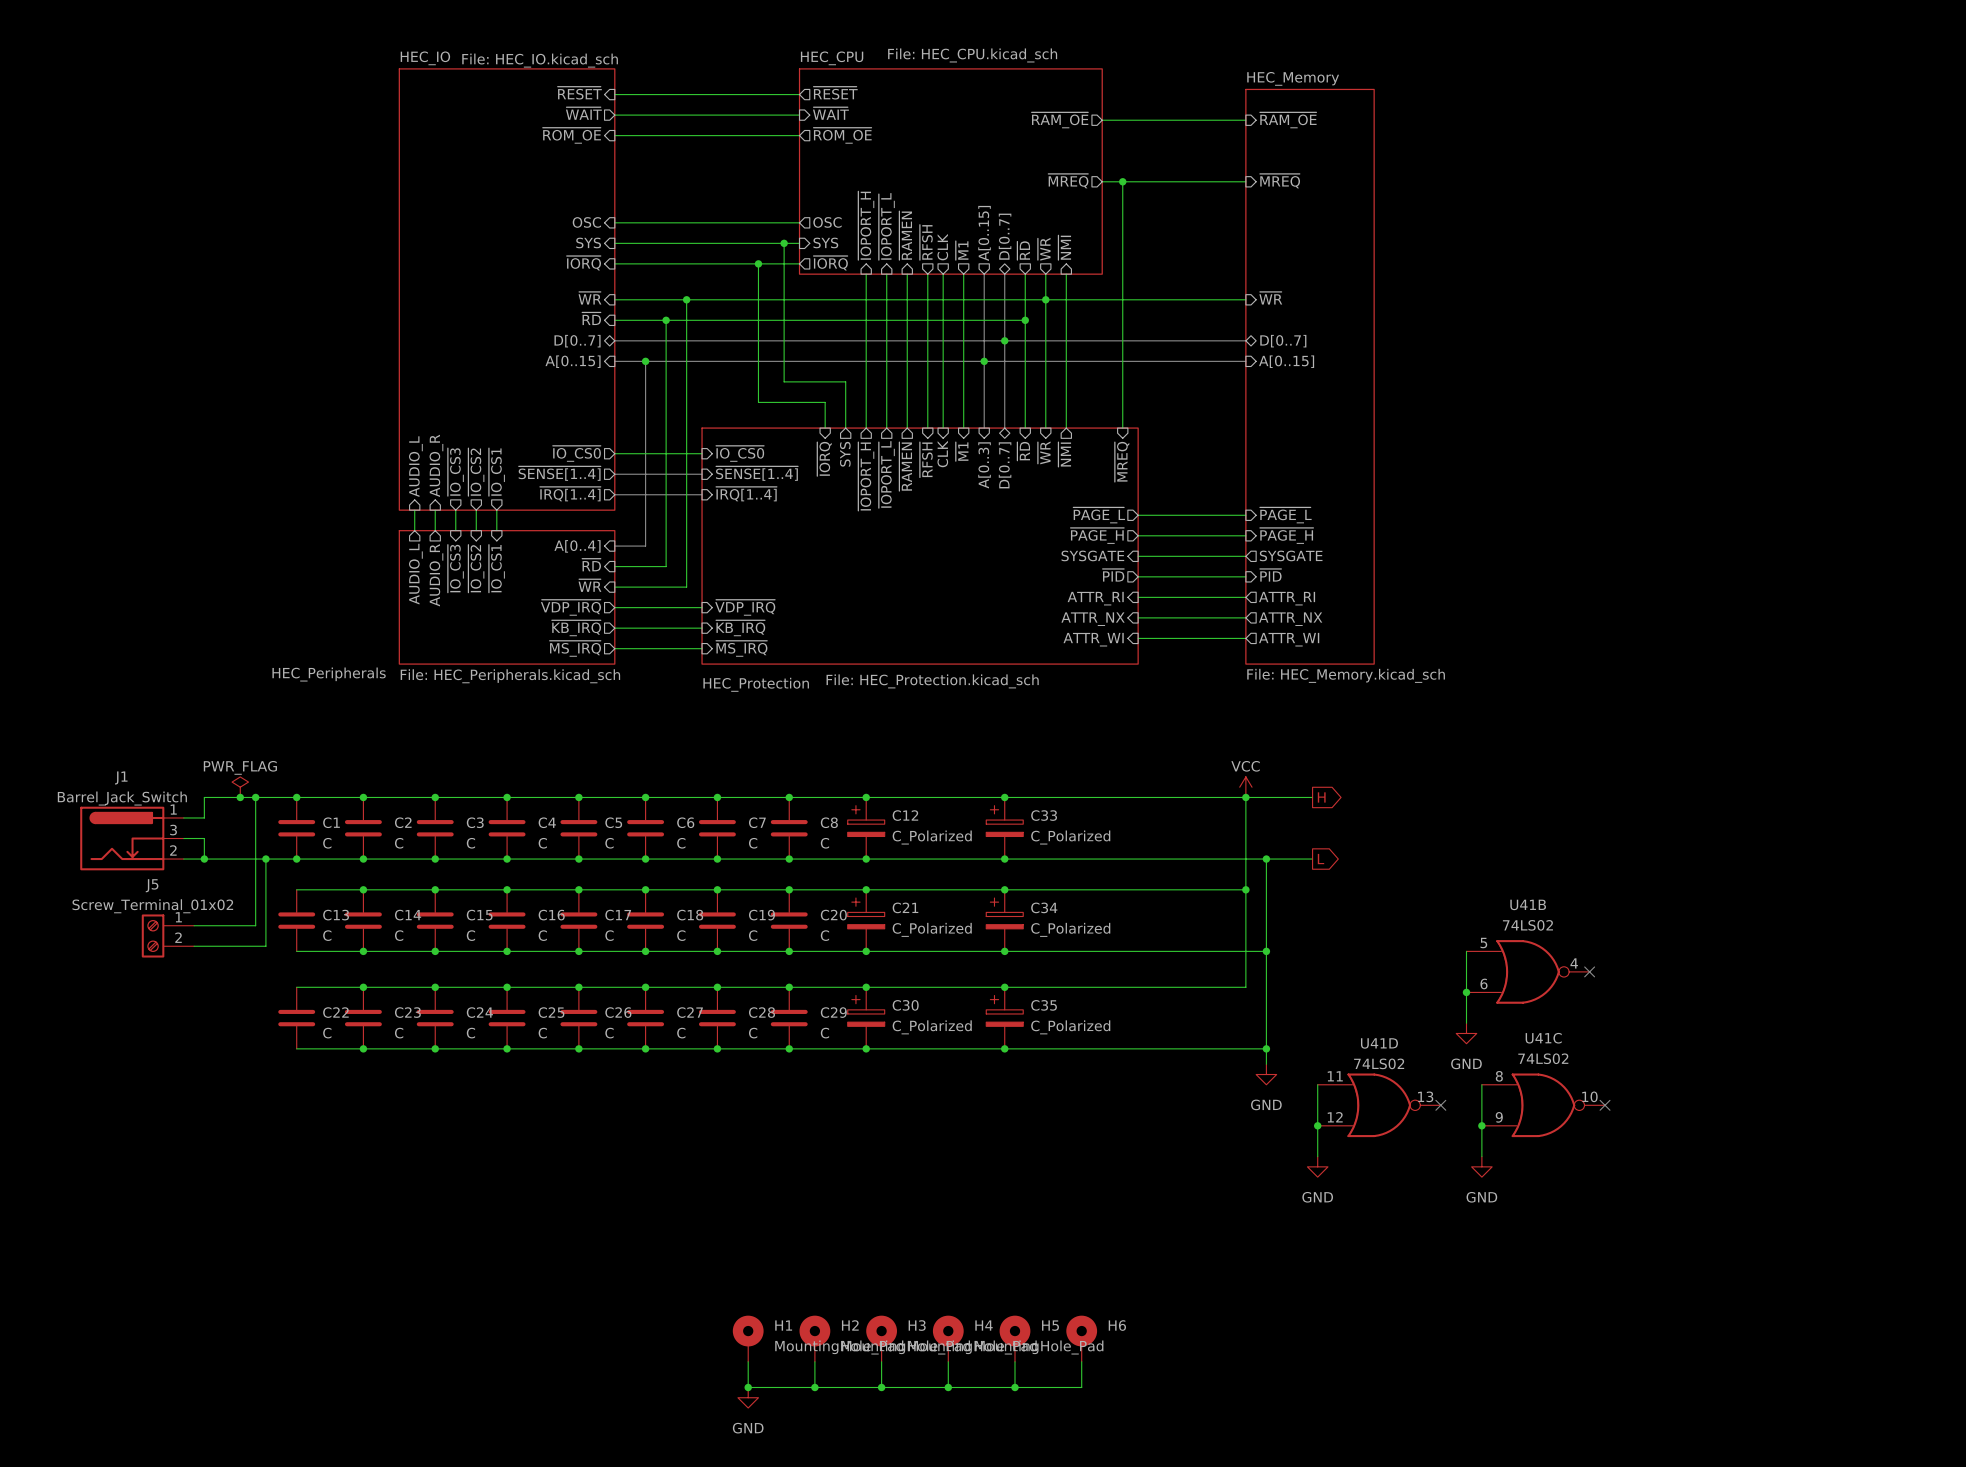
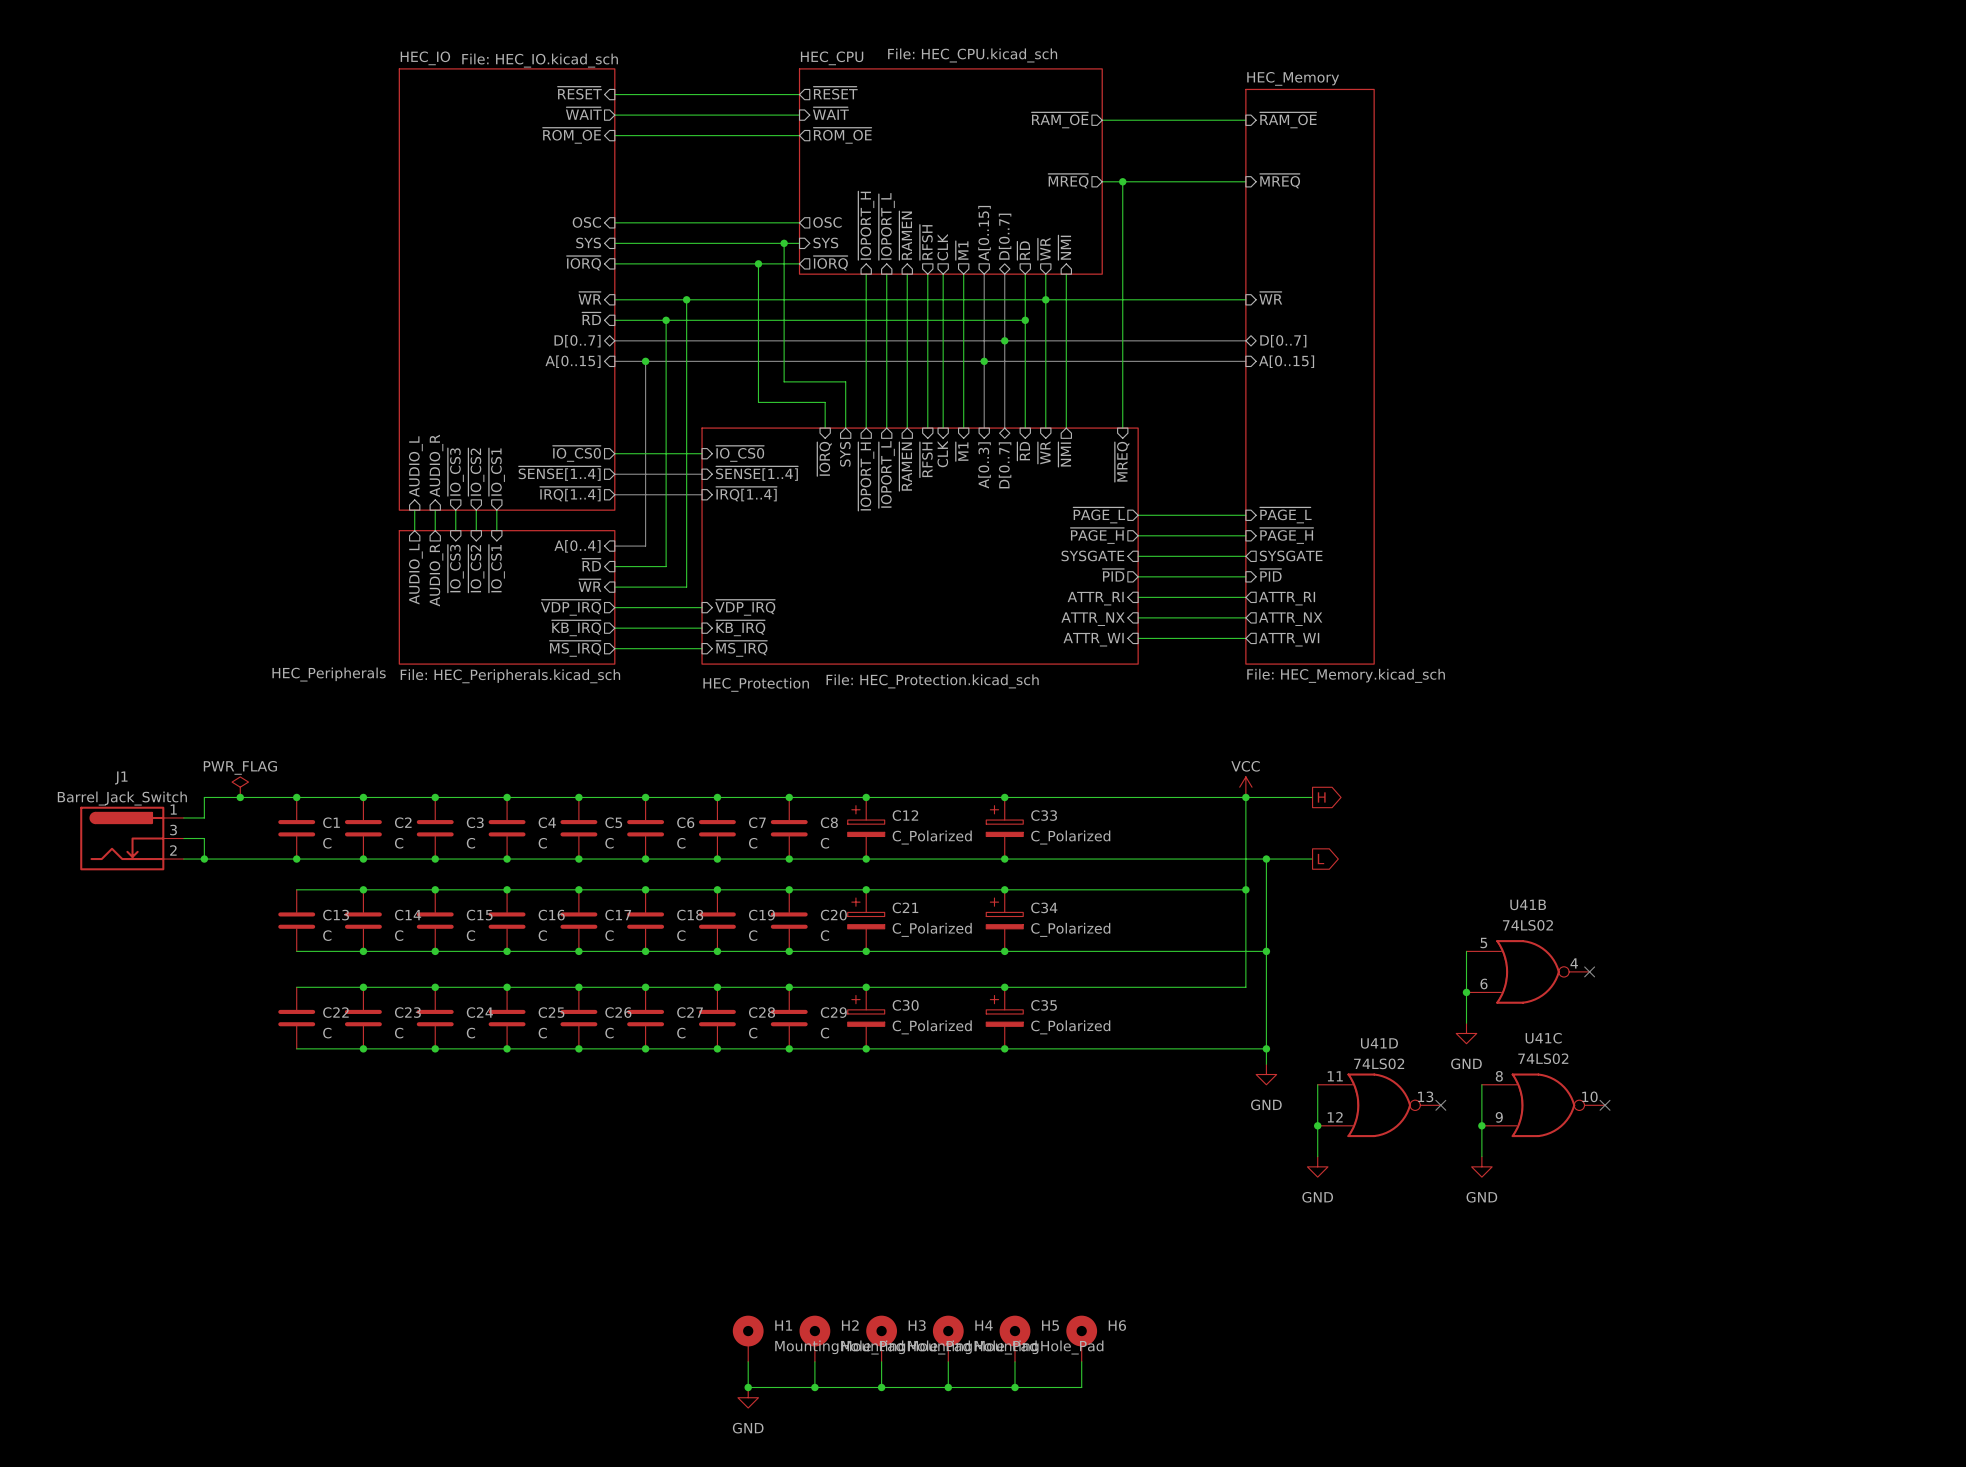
wire: (255, 797) (255, 925) (194, 925) -> none
junction: (255, 797) -> none
wire: (265, 859) (265, 946) (194, 946) -> none
junction: (265, 859) -> none
J5: Screw_Terminal_01x02 (167, 935) -> none

